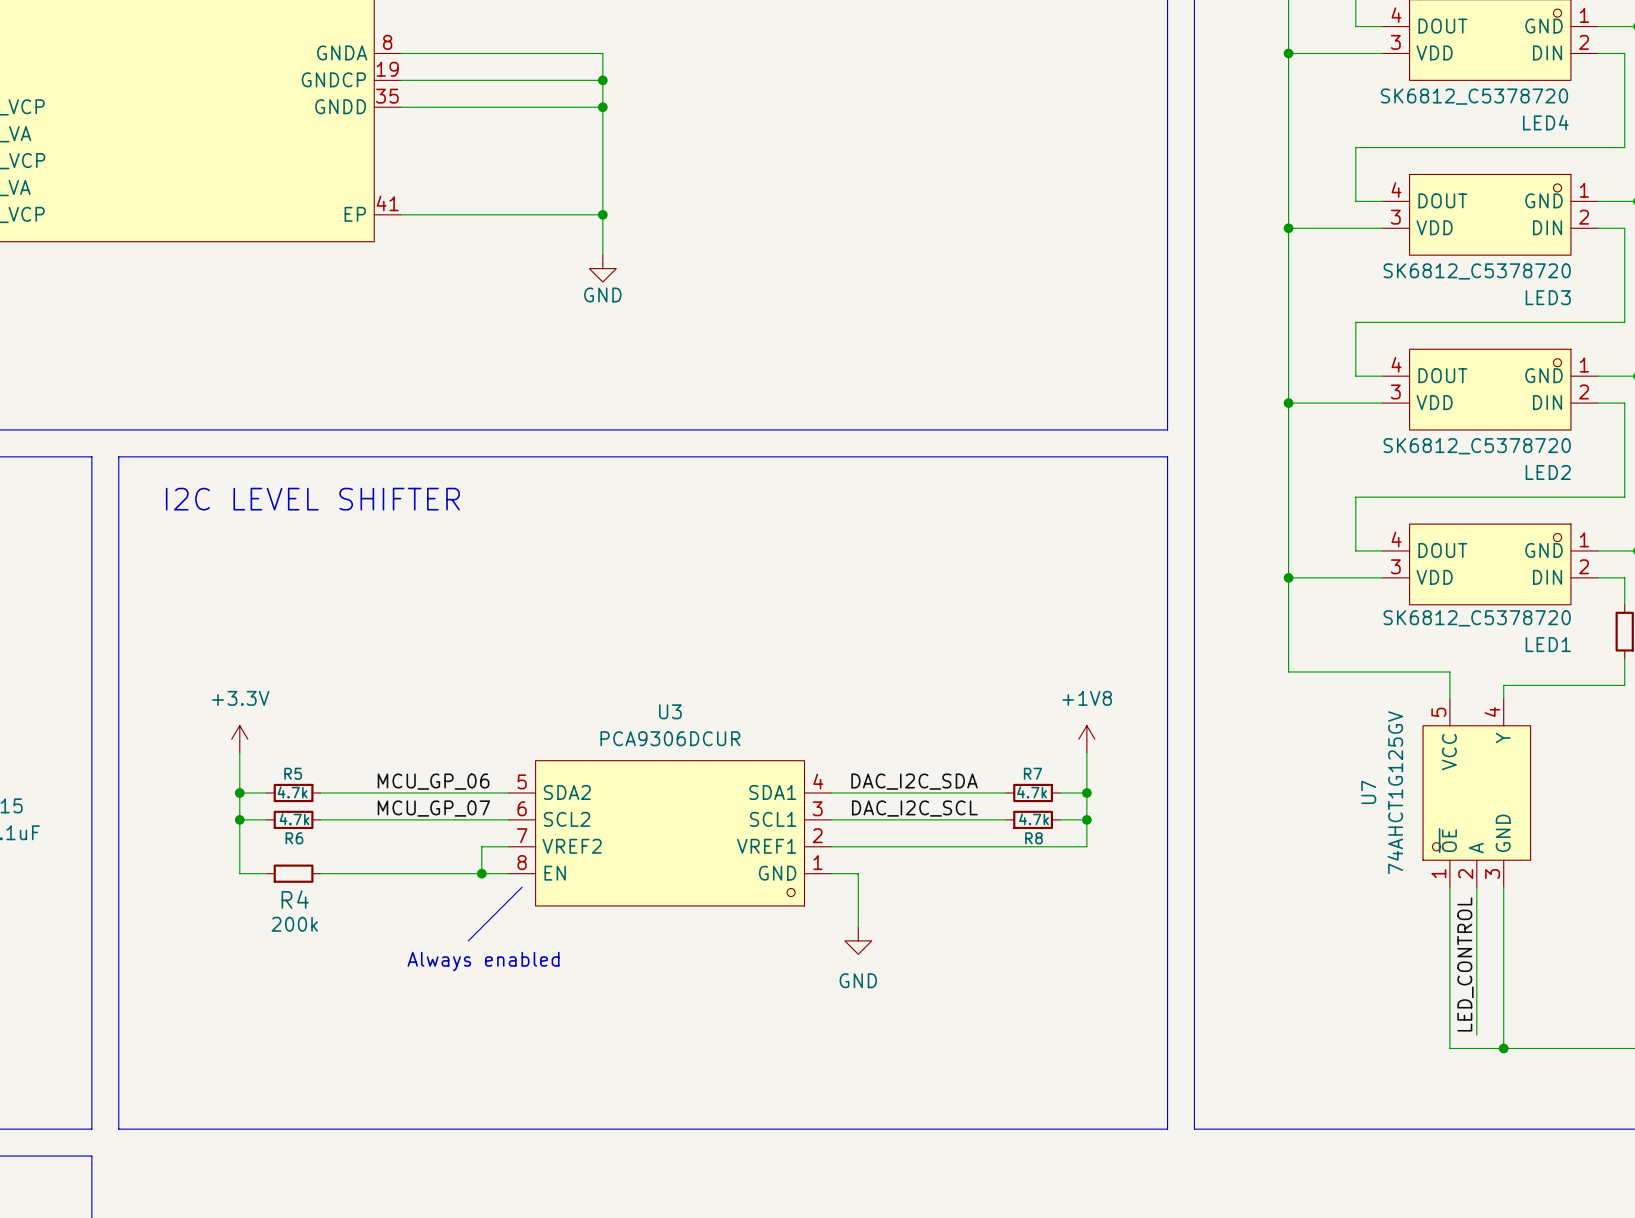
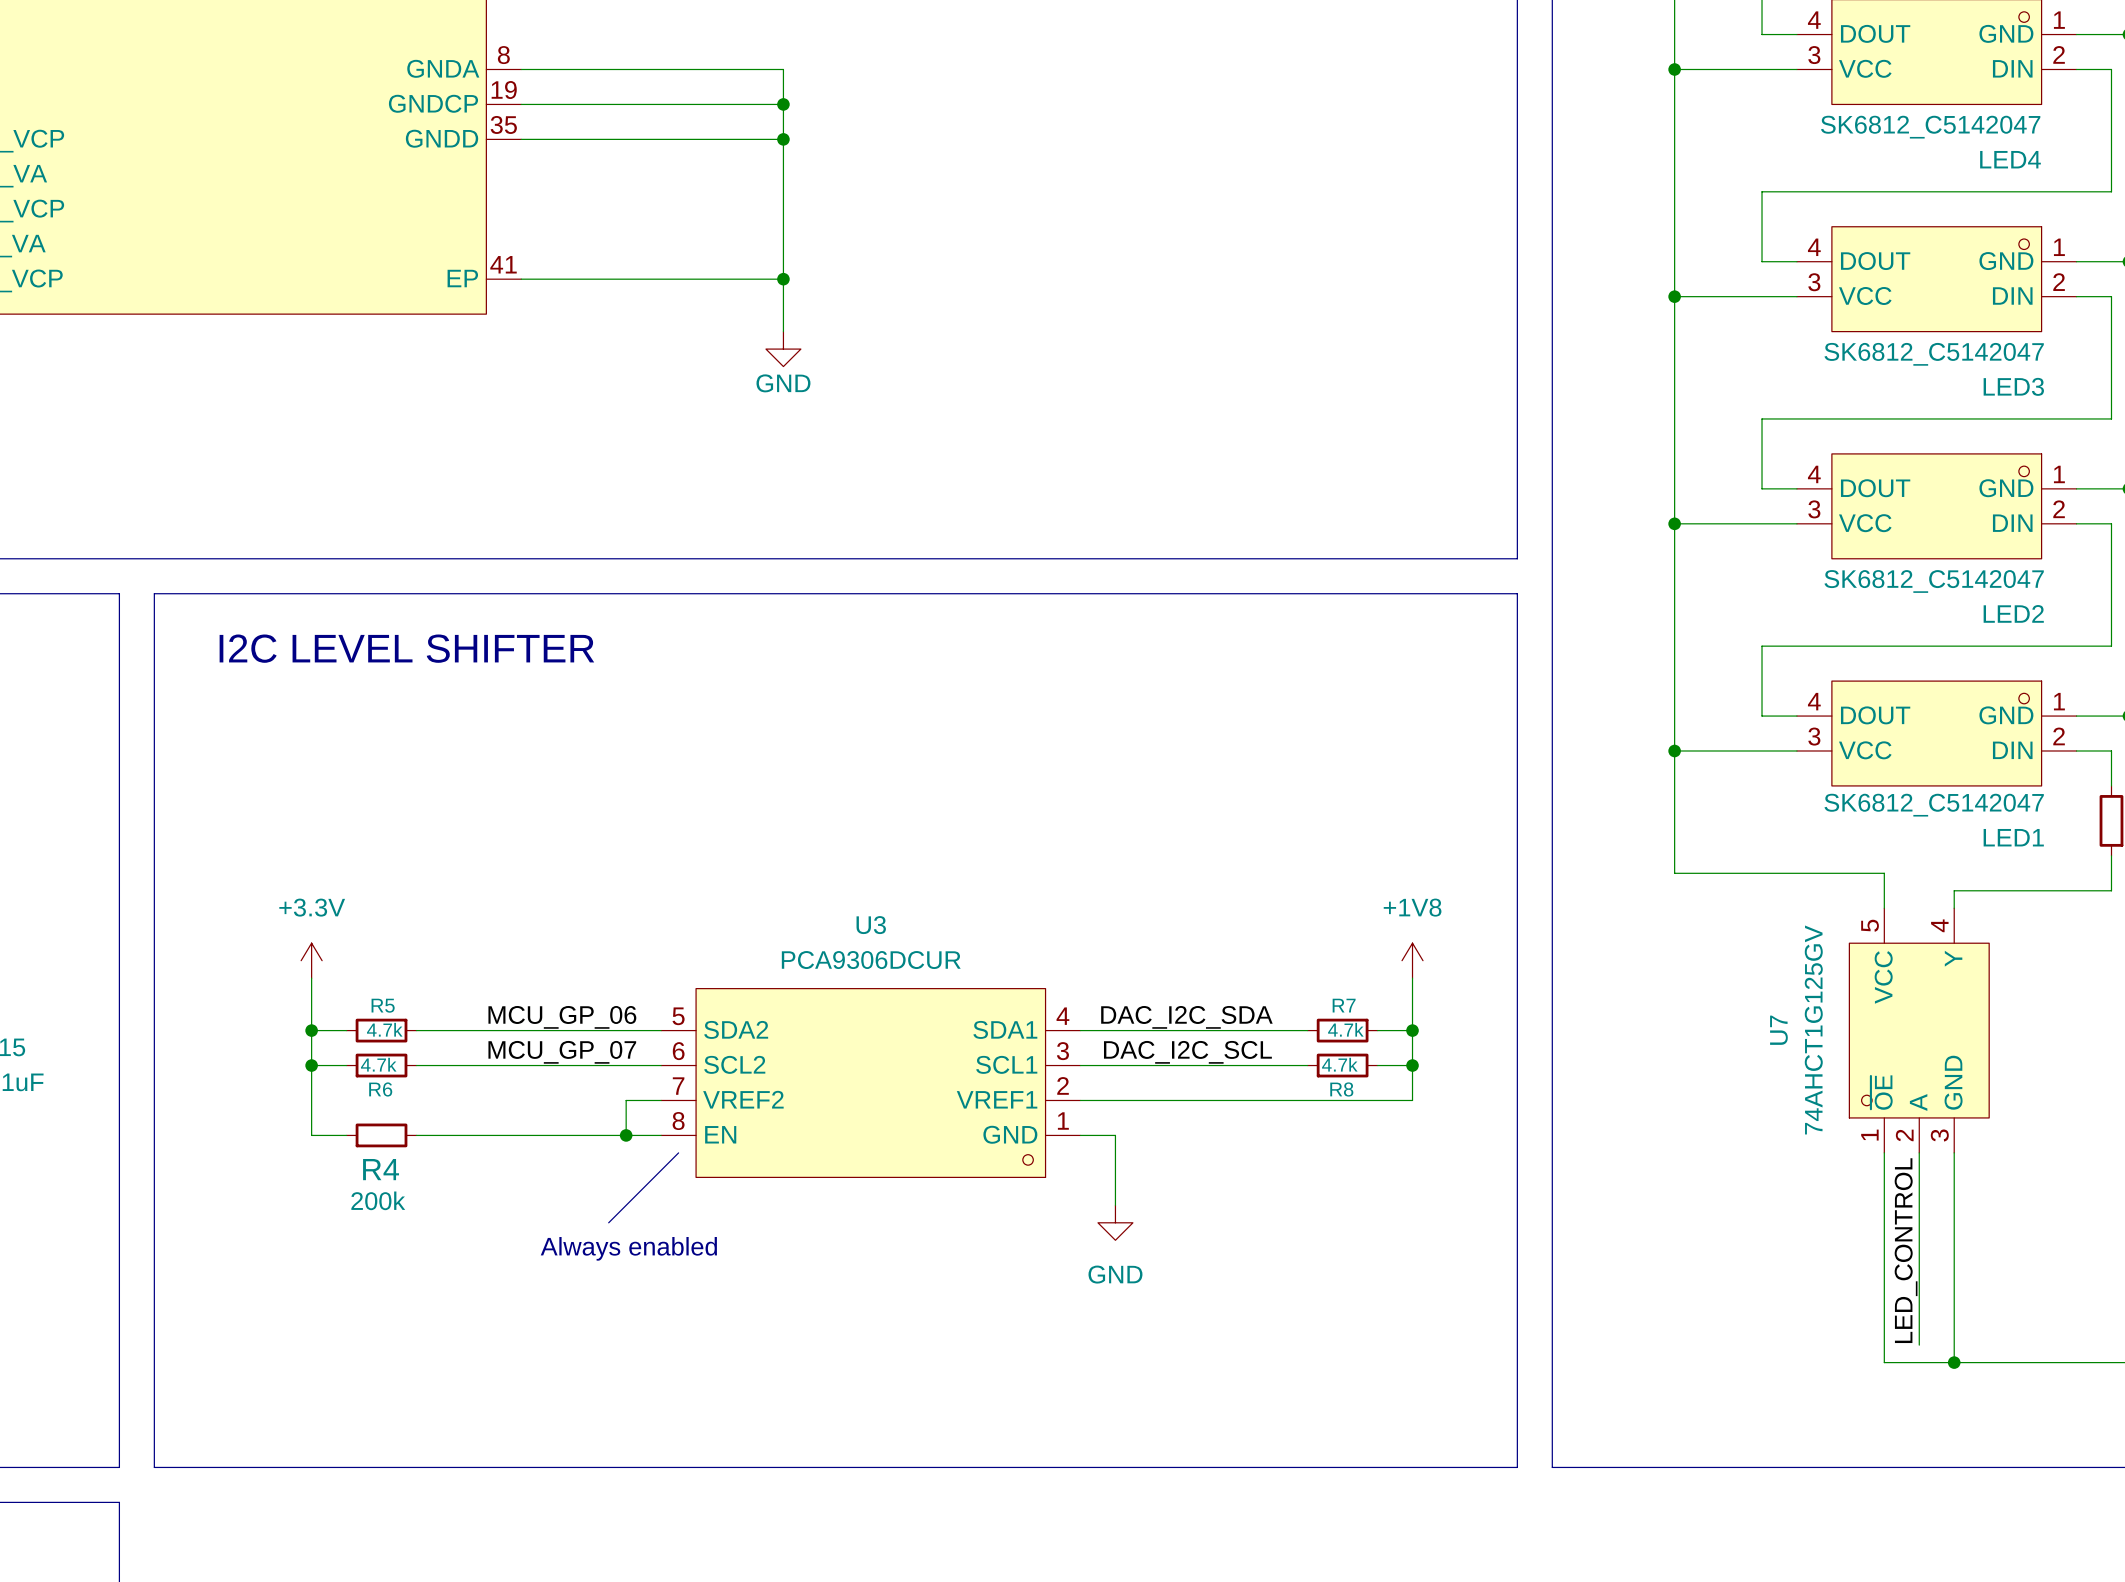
LED4 pin name: VDD (1434, 52) -> VCC (1865, 68)
LED4 value: SK6812_C5378720 (1474, 96) -> SK6812_C5142047 (1930, 127)
LED3 pin name: VDD (1434, 227) -> VCC (1865, 295)
LED3 value: SK6812_C5378720 (1477, 271) -> SK6812_C5142047 (1934, 354)
LED2 pin name: VDD (1434, 402) -> VCC (1865, 523)
LED2 value: SK6812_C5378720 (1477, 446) -> SK6812_C5142047 (1934, 581)
LED1 pin name: VDD (1434, 577) -> VCC (1865, 750)
LED1 value: SK6812_C5378720 (1477, 618) -> SK6812_C5142047 (1934, 805)

